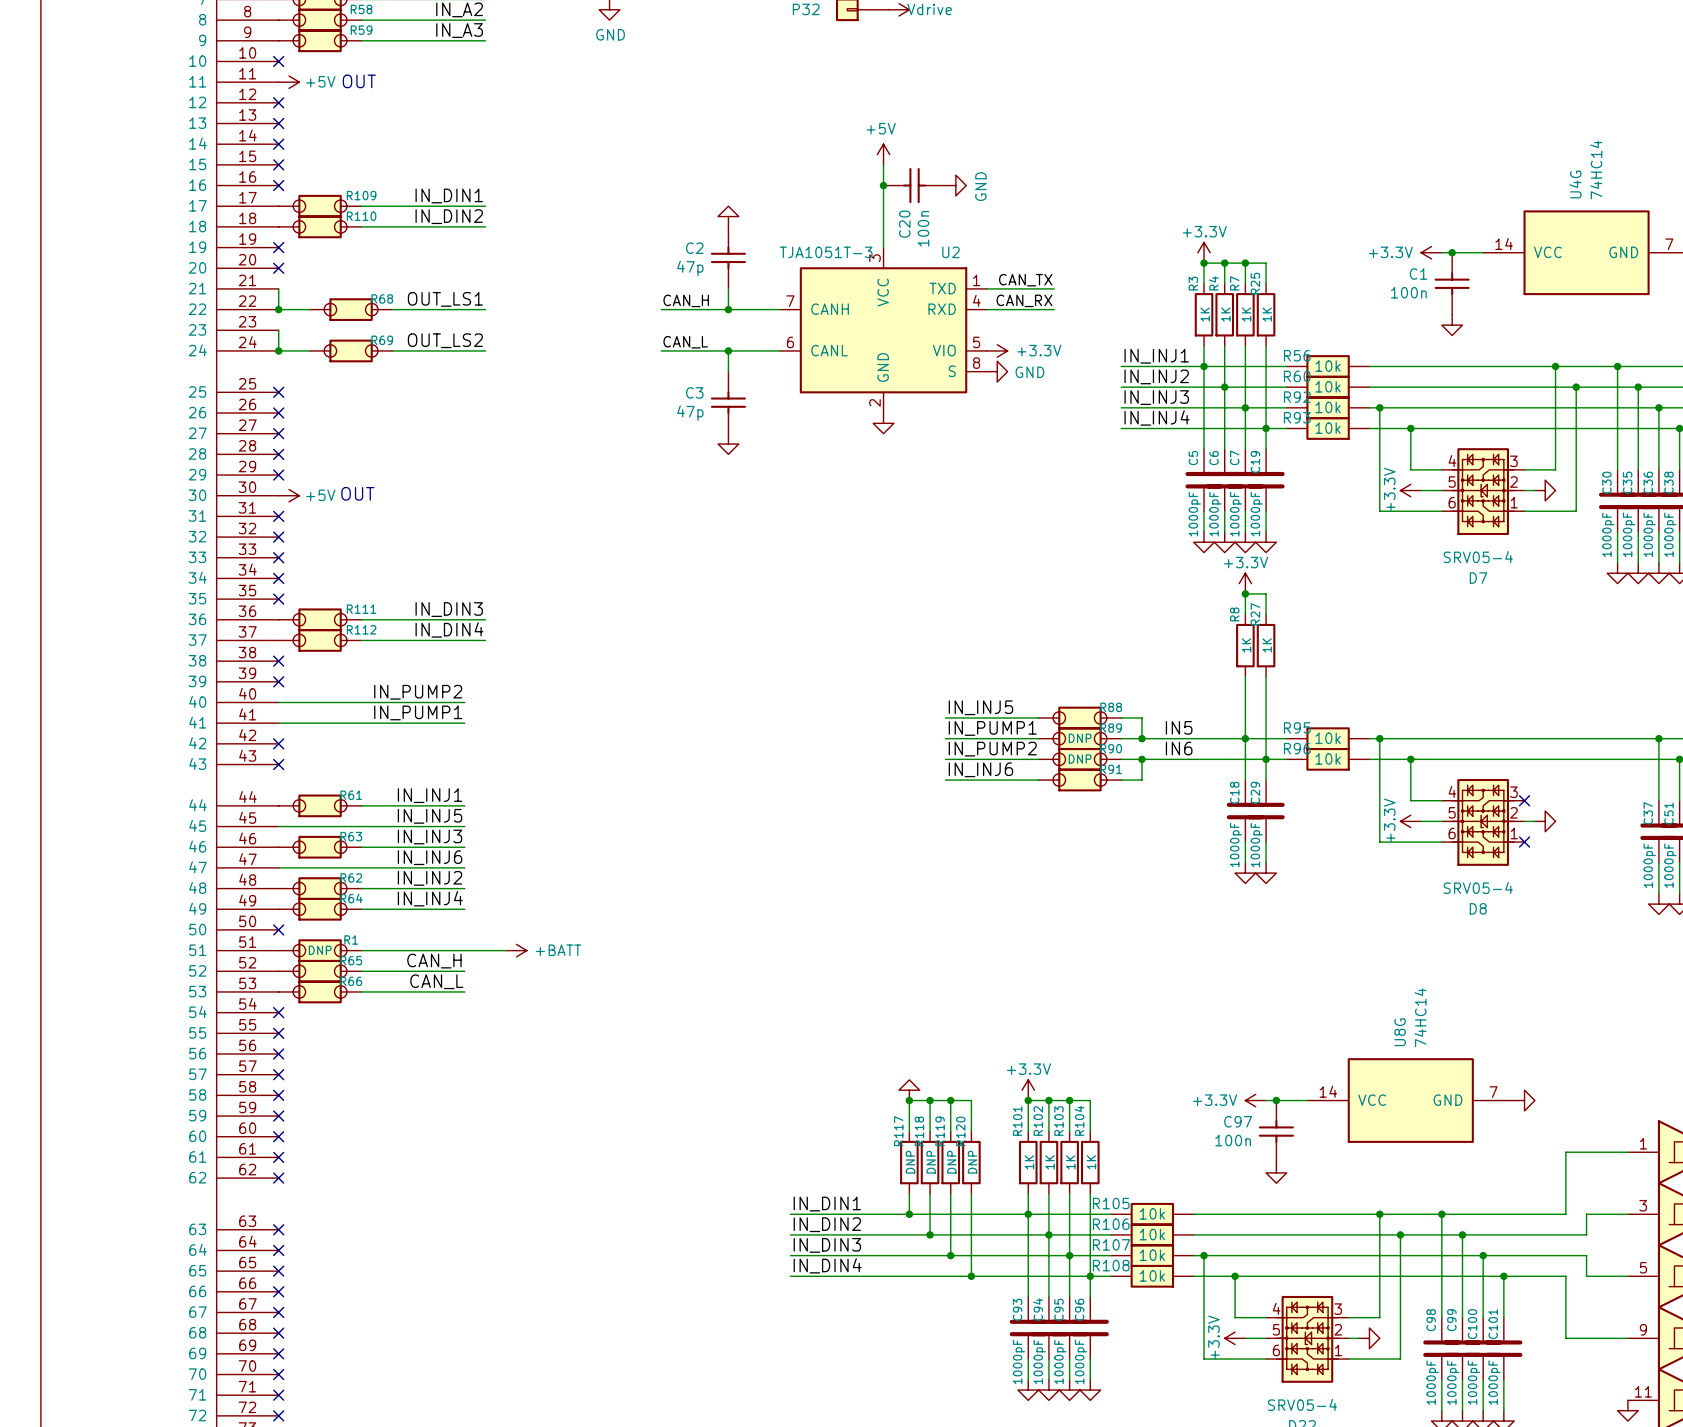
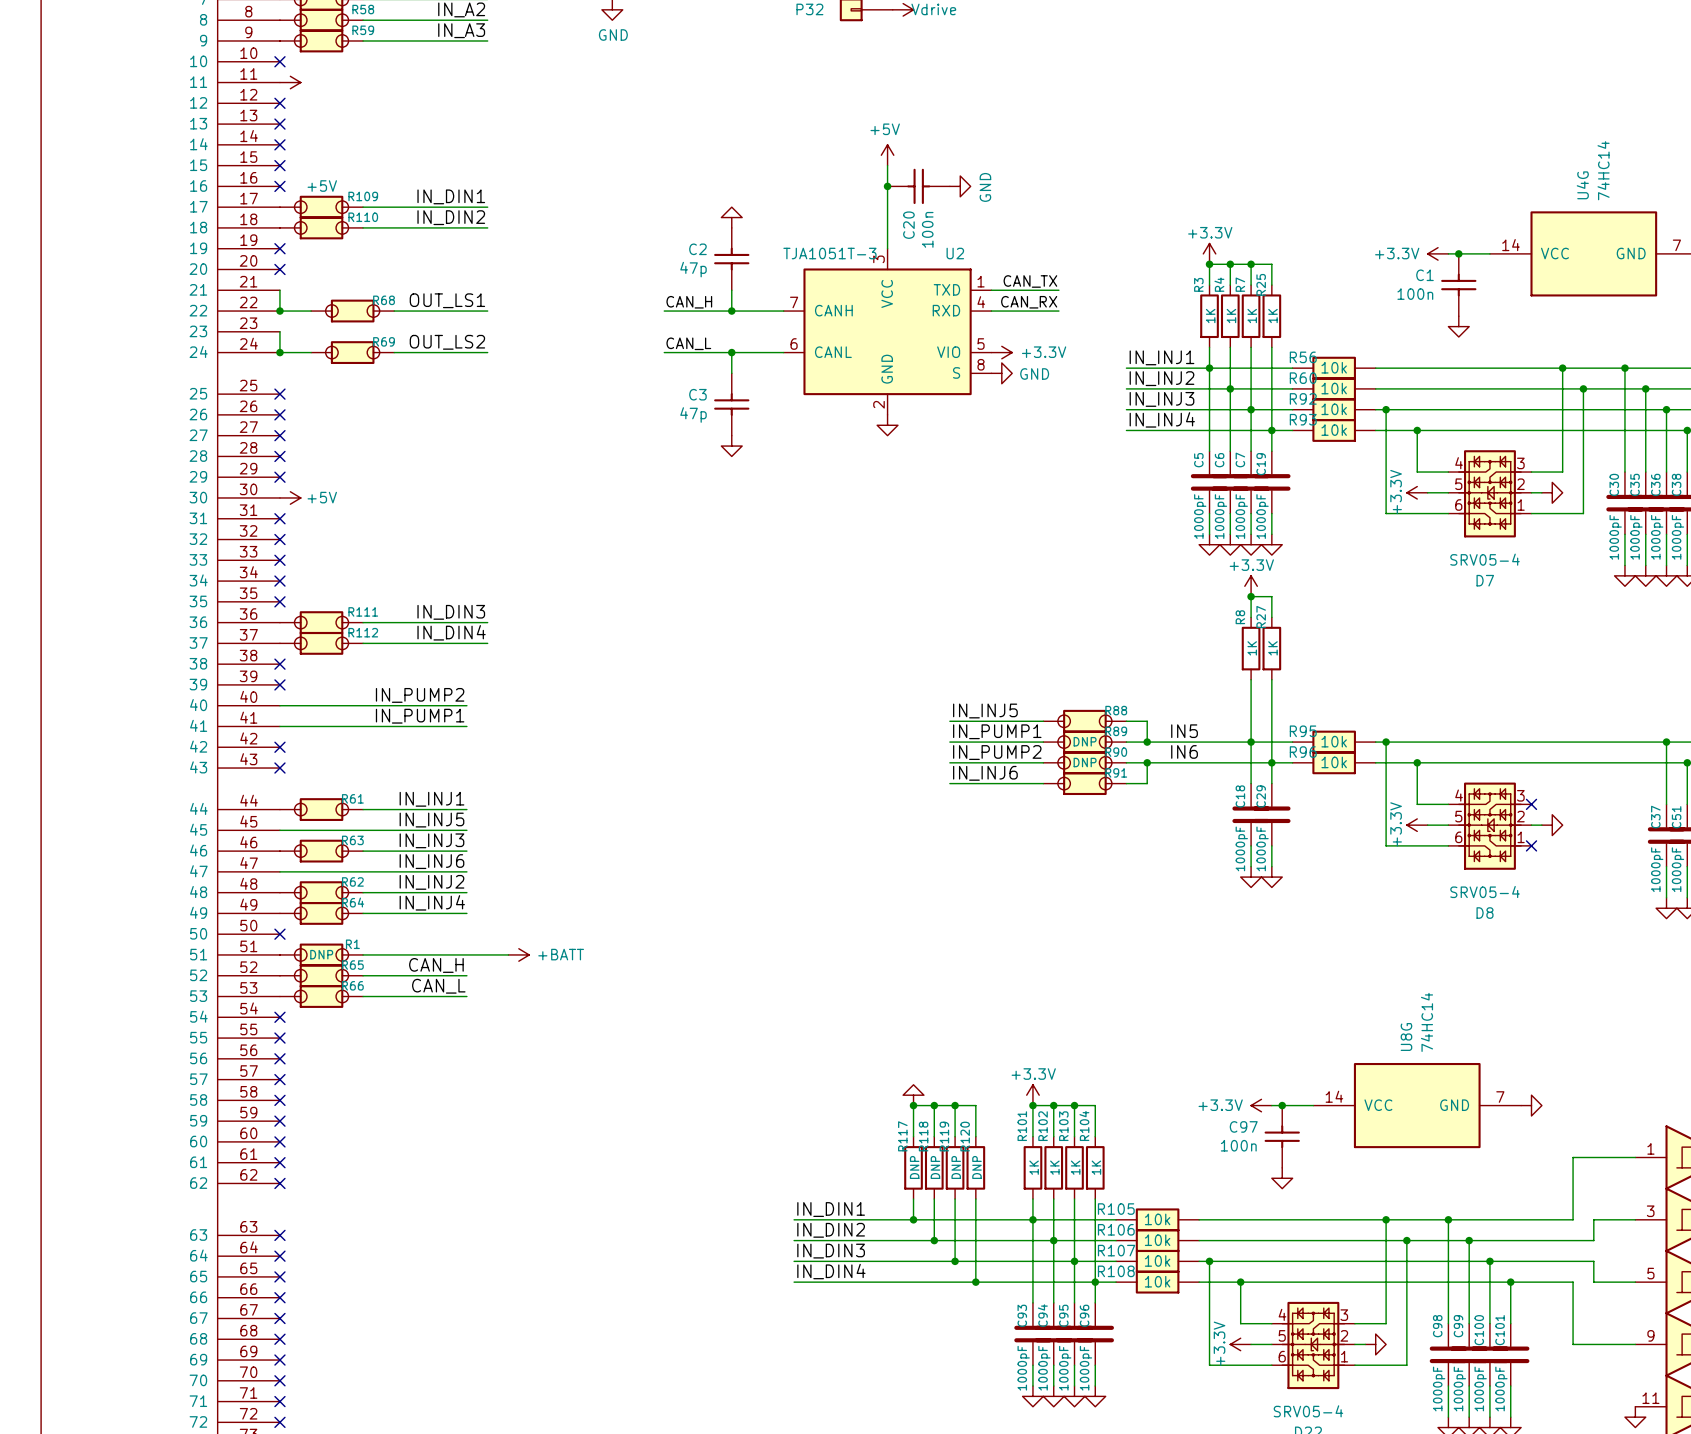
power symbol text position: +5V (320, 81) -> +5V (322, 186)
text: OUT (359, 81) -> none
text: OUT (357, 493) -> none

